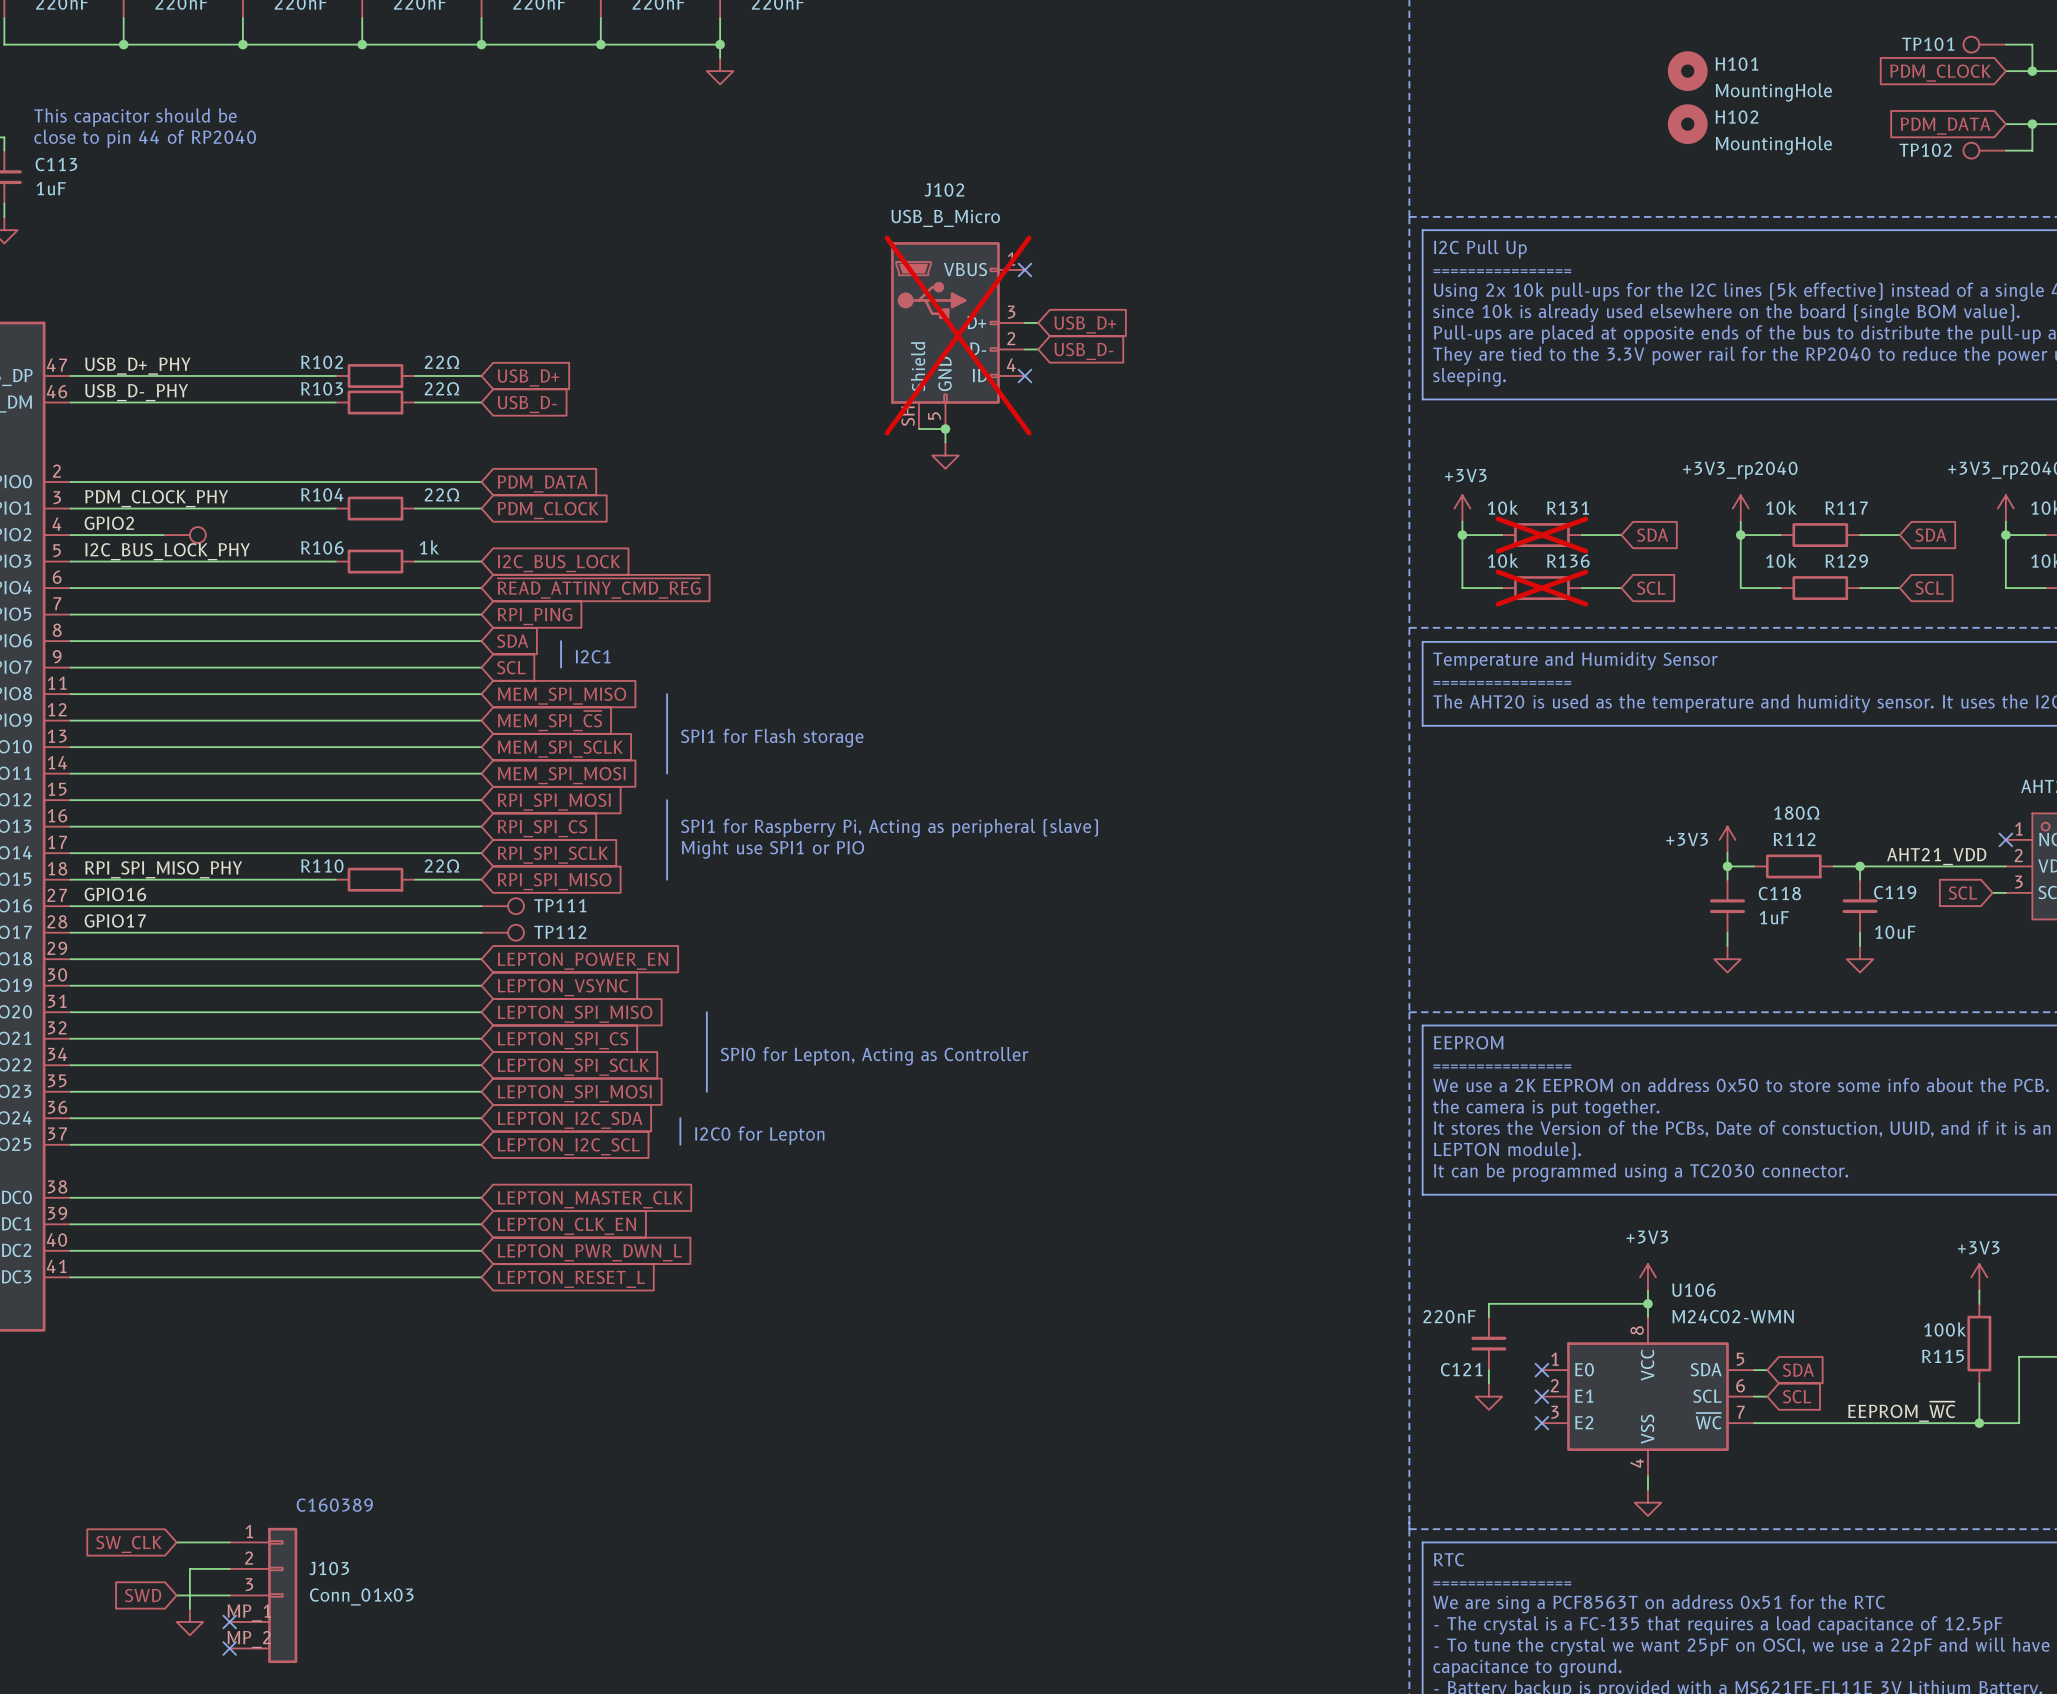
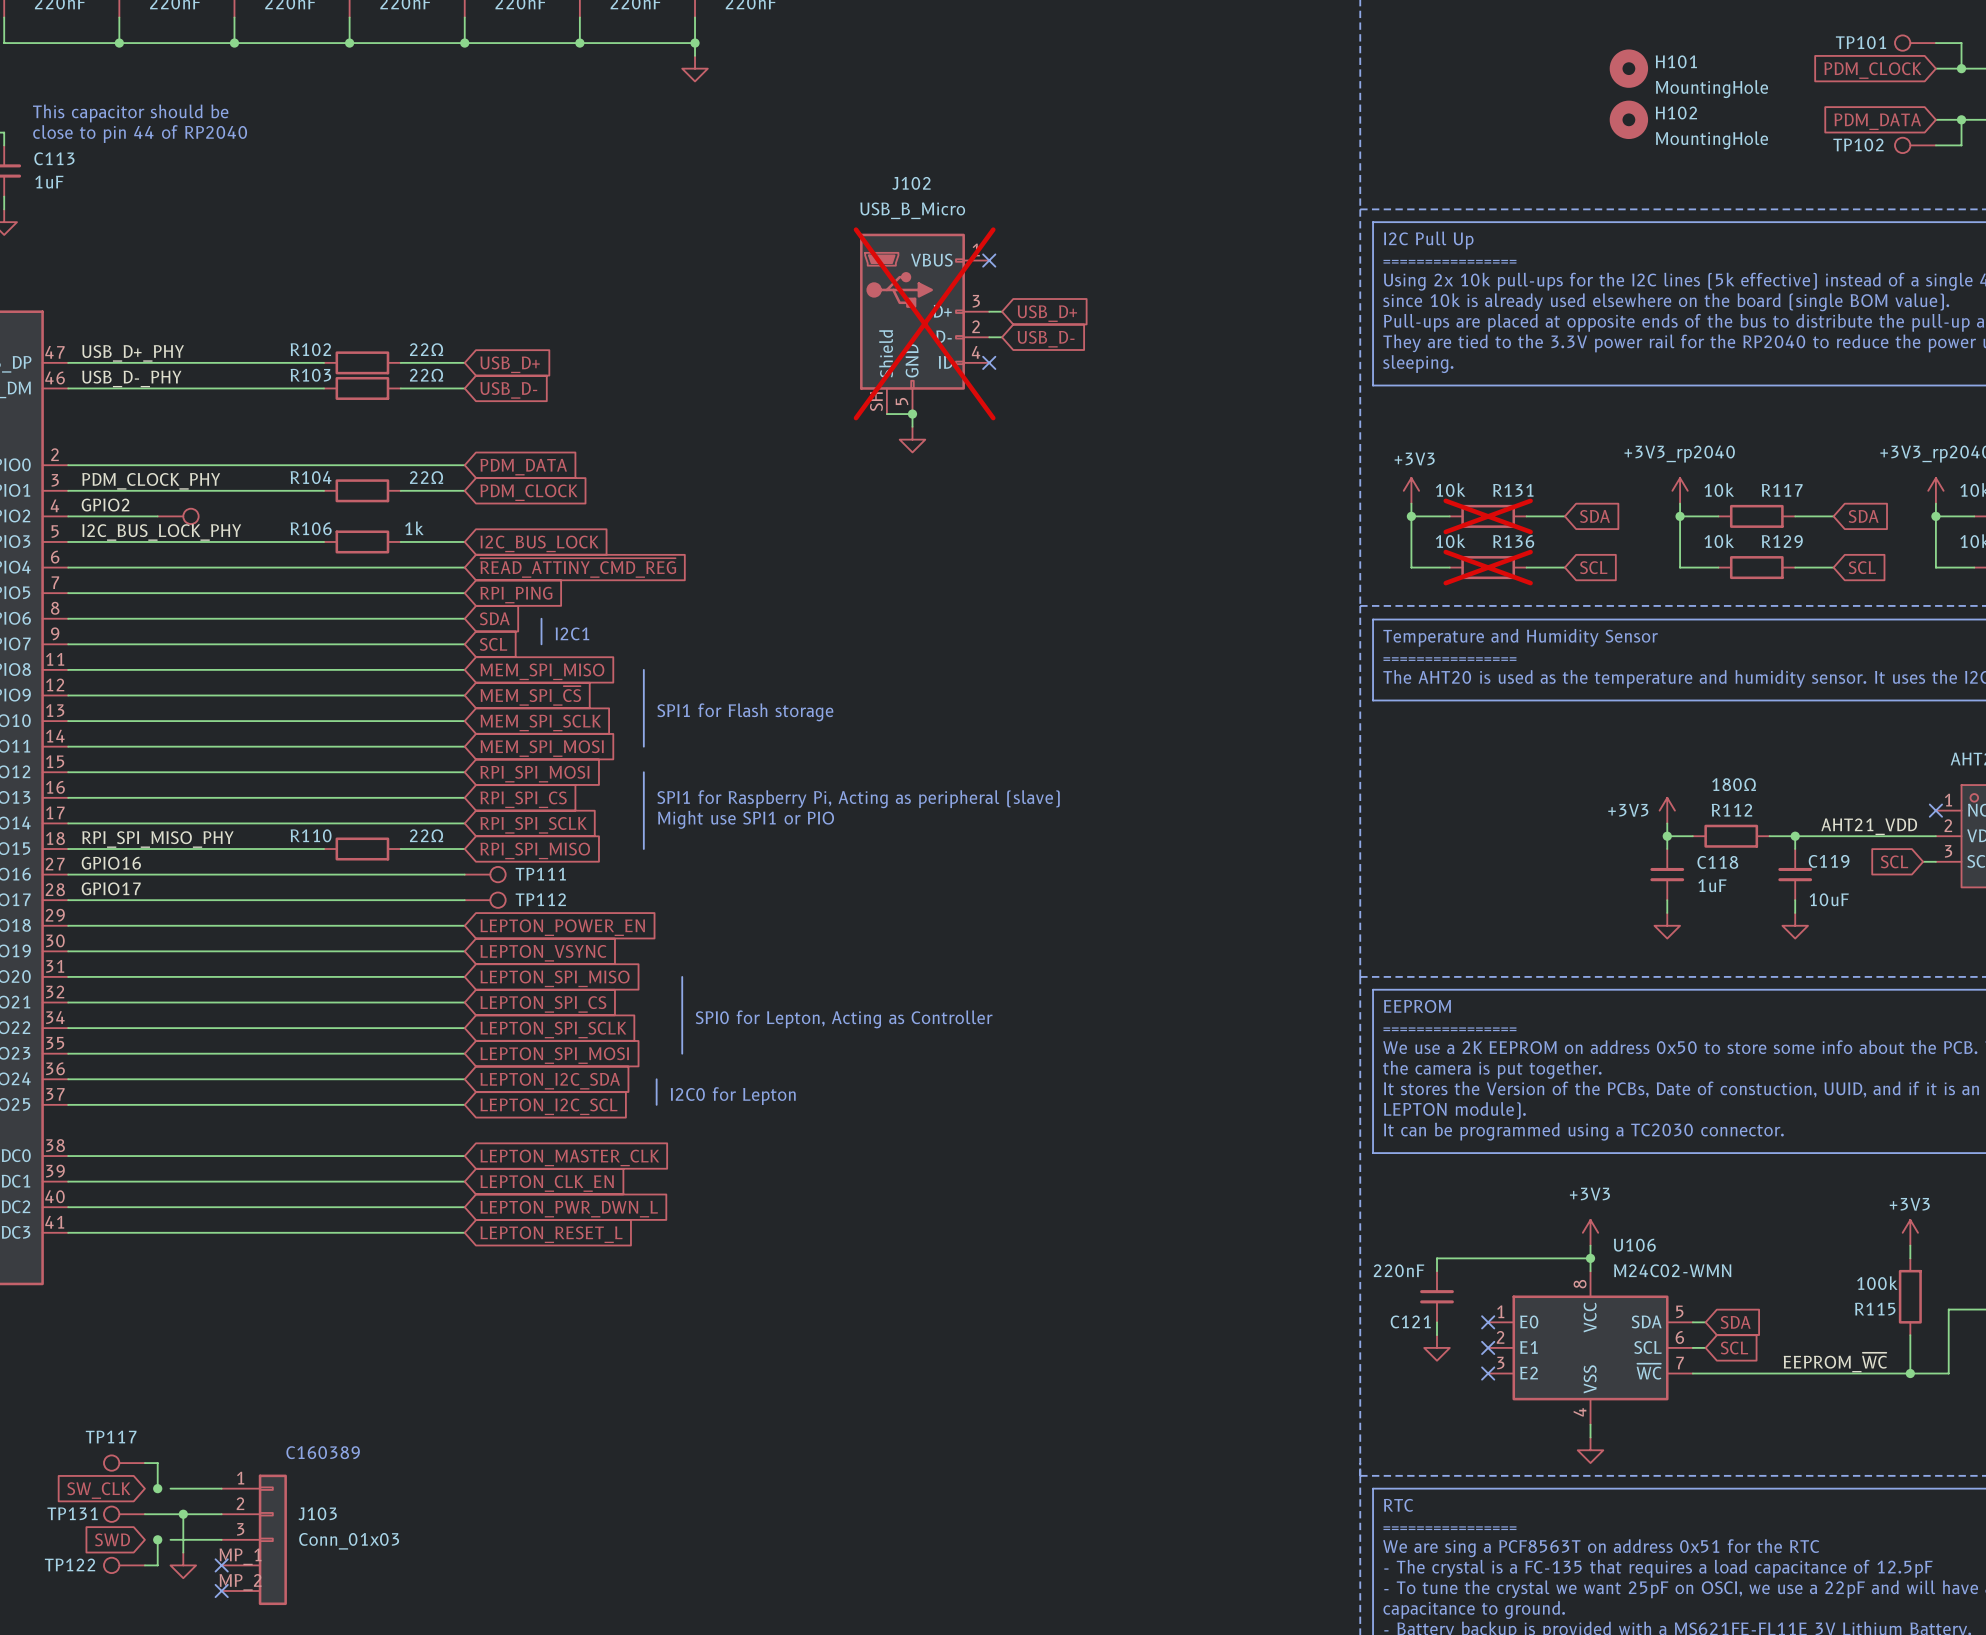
TP117: none -> (124, 1463)
wire: none -> (144, 1463) (157, 1463) (157, 1488)
junction: none -> (157, 1488)
global label position: SW_CLK (128, 1544) -> SW_CLK (98, 1490)
TP131: none -> (124, 1514)
wire: none -> (144, 1514) (183, 1514)
junction: none -> (183, 1514)
global label position: SWD (143, 1595) -> SWD (112, 1539)
wire: none -> (157, 1539) (157, 1565) (144, 1565)
junction: none -> (157, 1539)
TP122: none -> (124, 1565)

